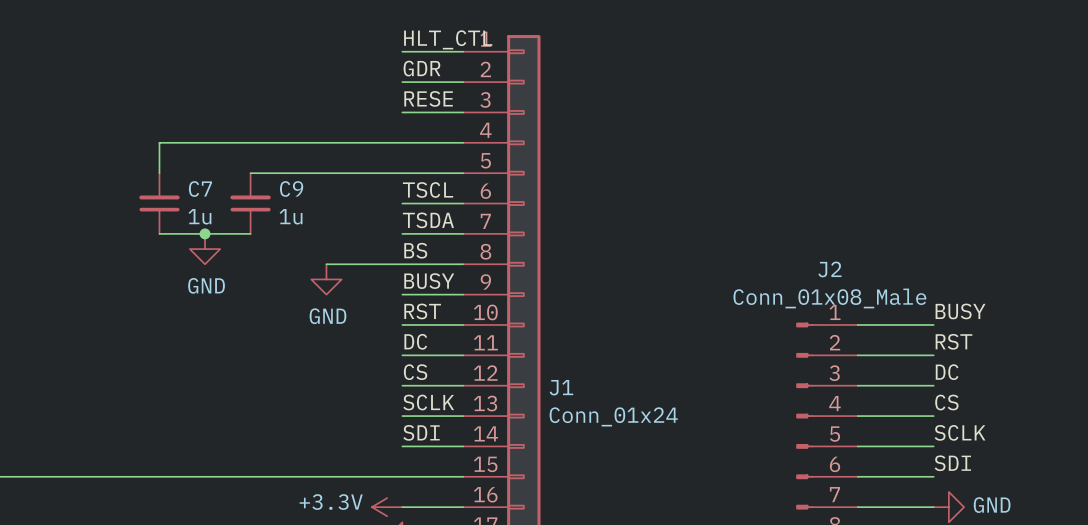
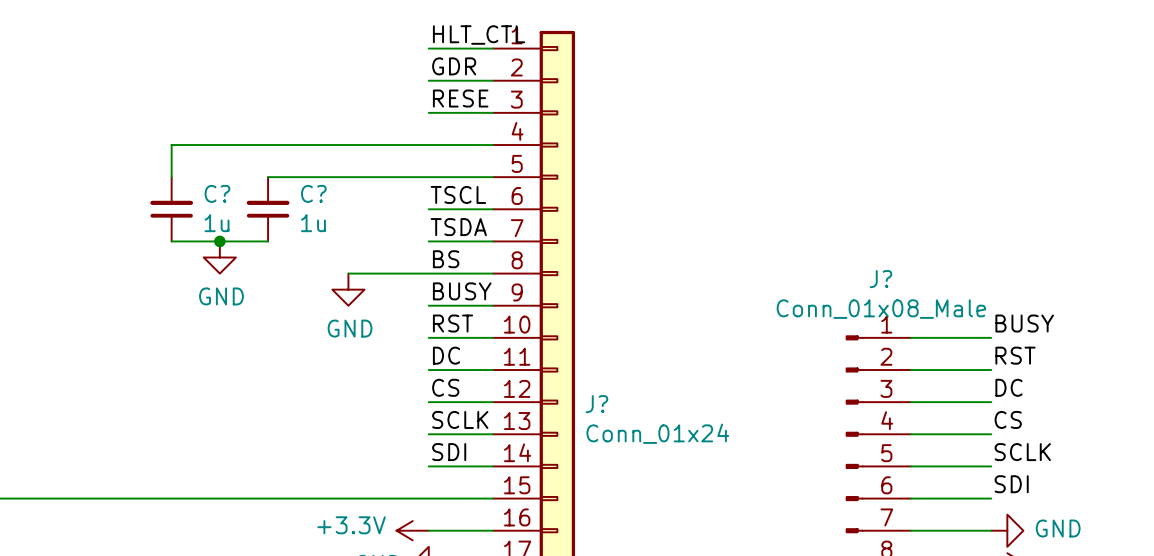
C7 name: C7 (200, 189) -> C? (217, 193)
C9 name: C9 (291, 189) -> C? (313, 193)
J2 name: J2 (829, 269) -> J? (880, 279)
J1 name: J1 (561, 387) -> J? (596, 404)

